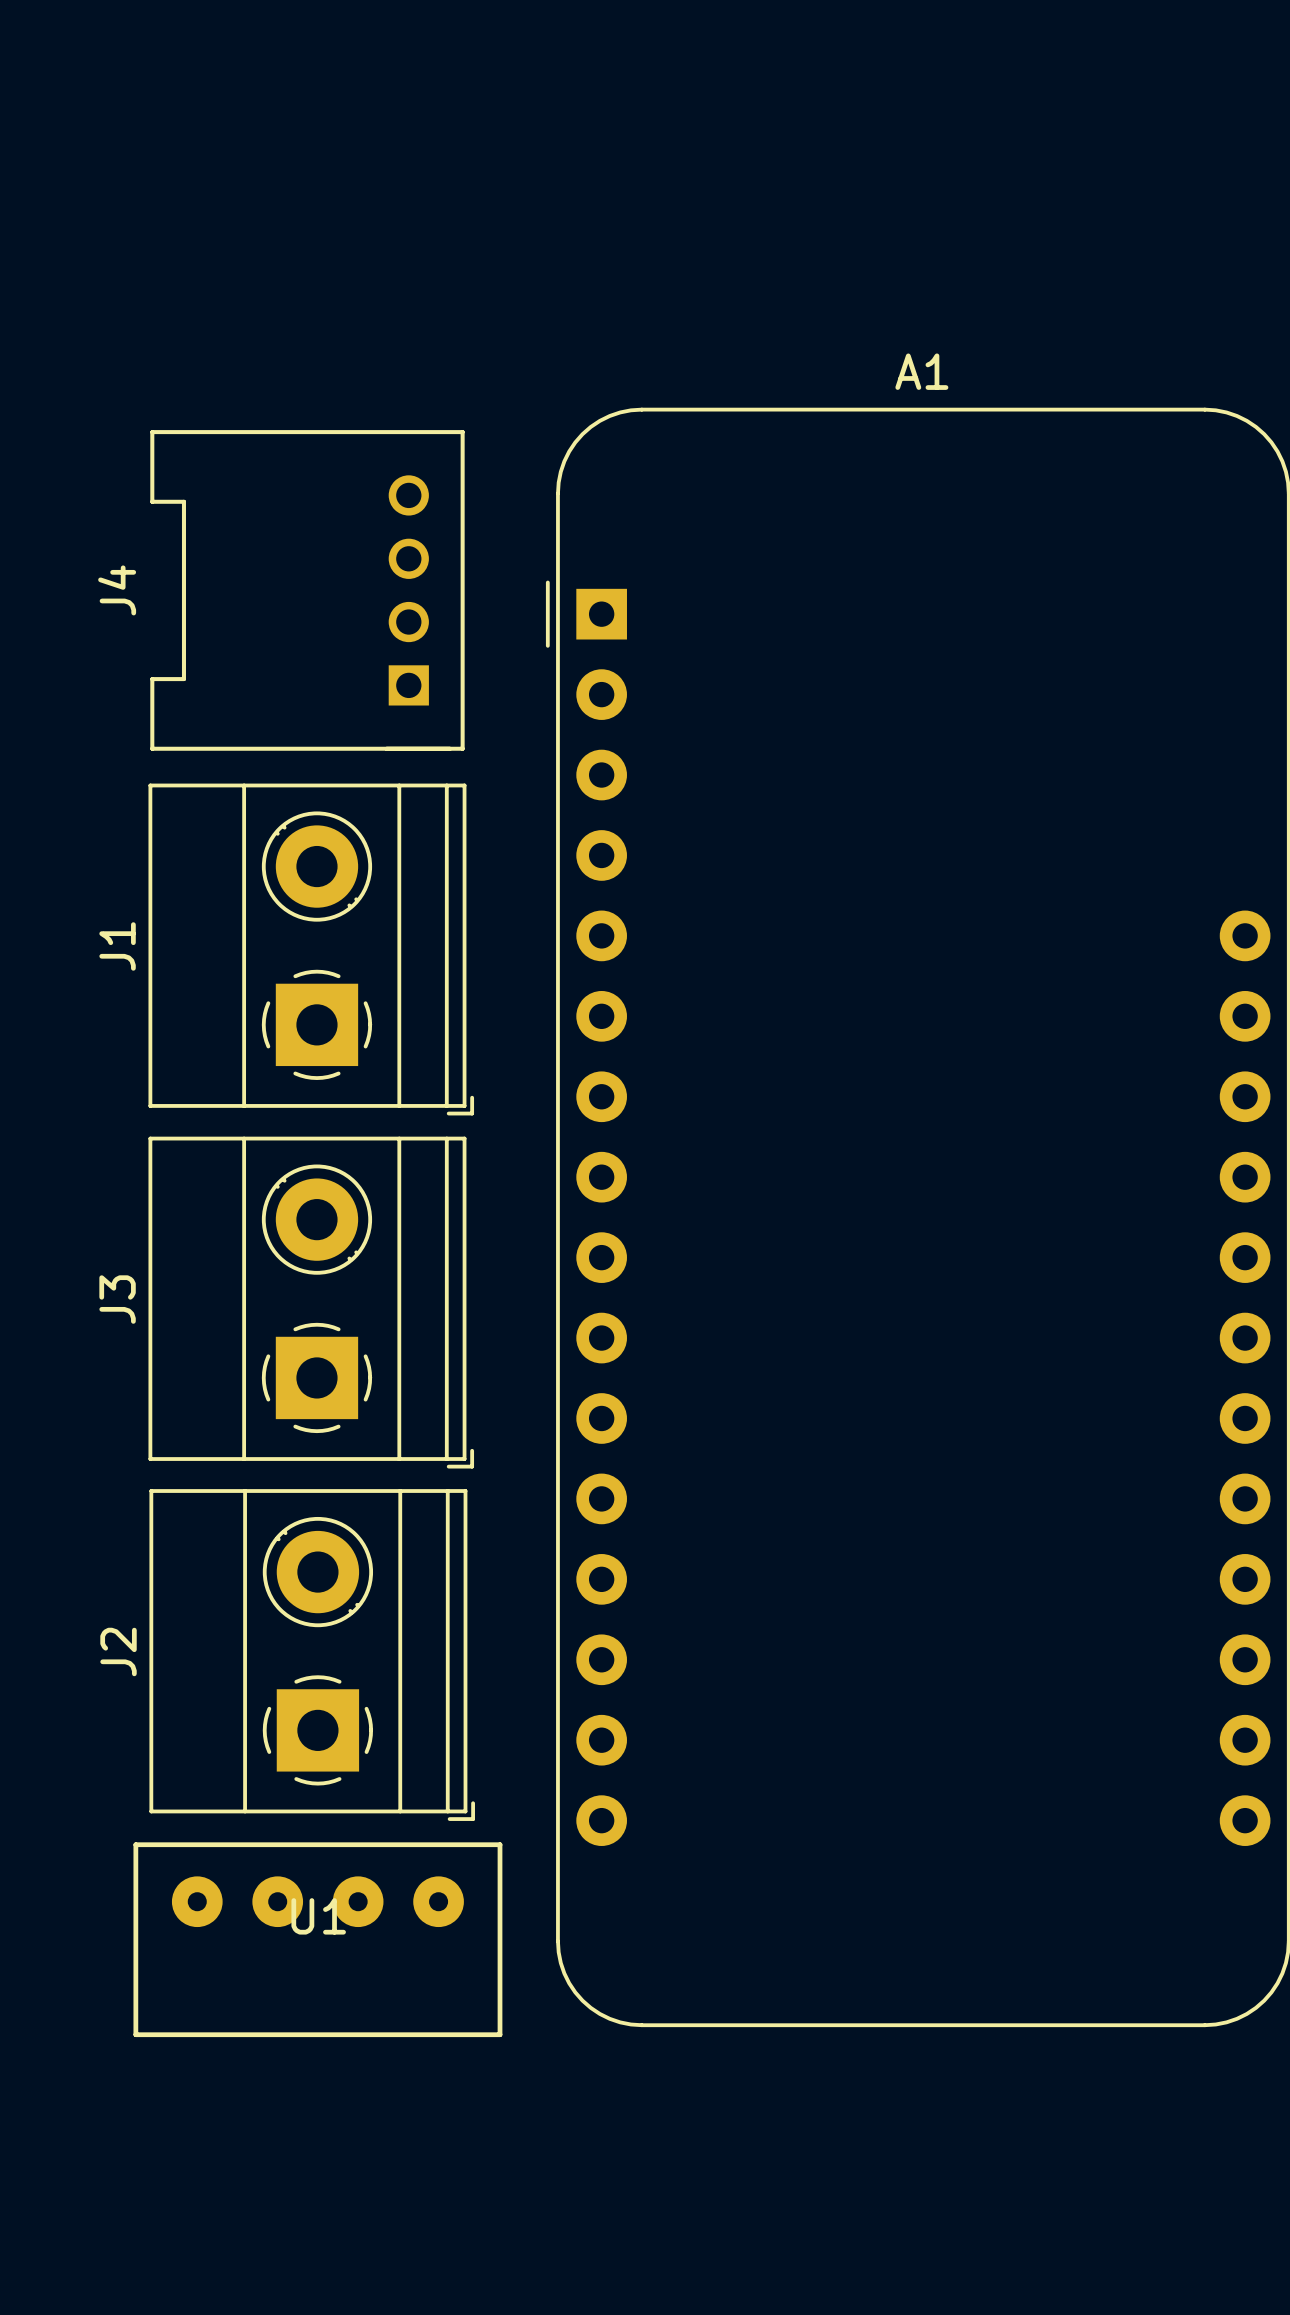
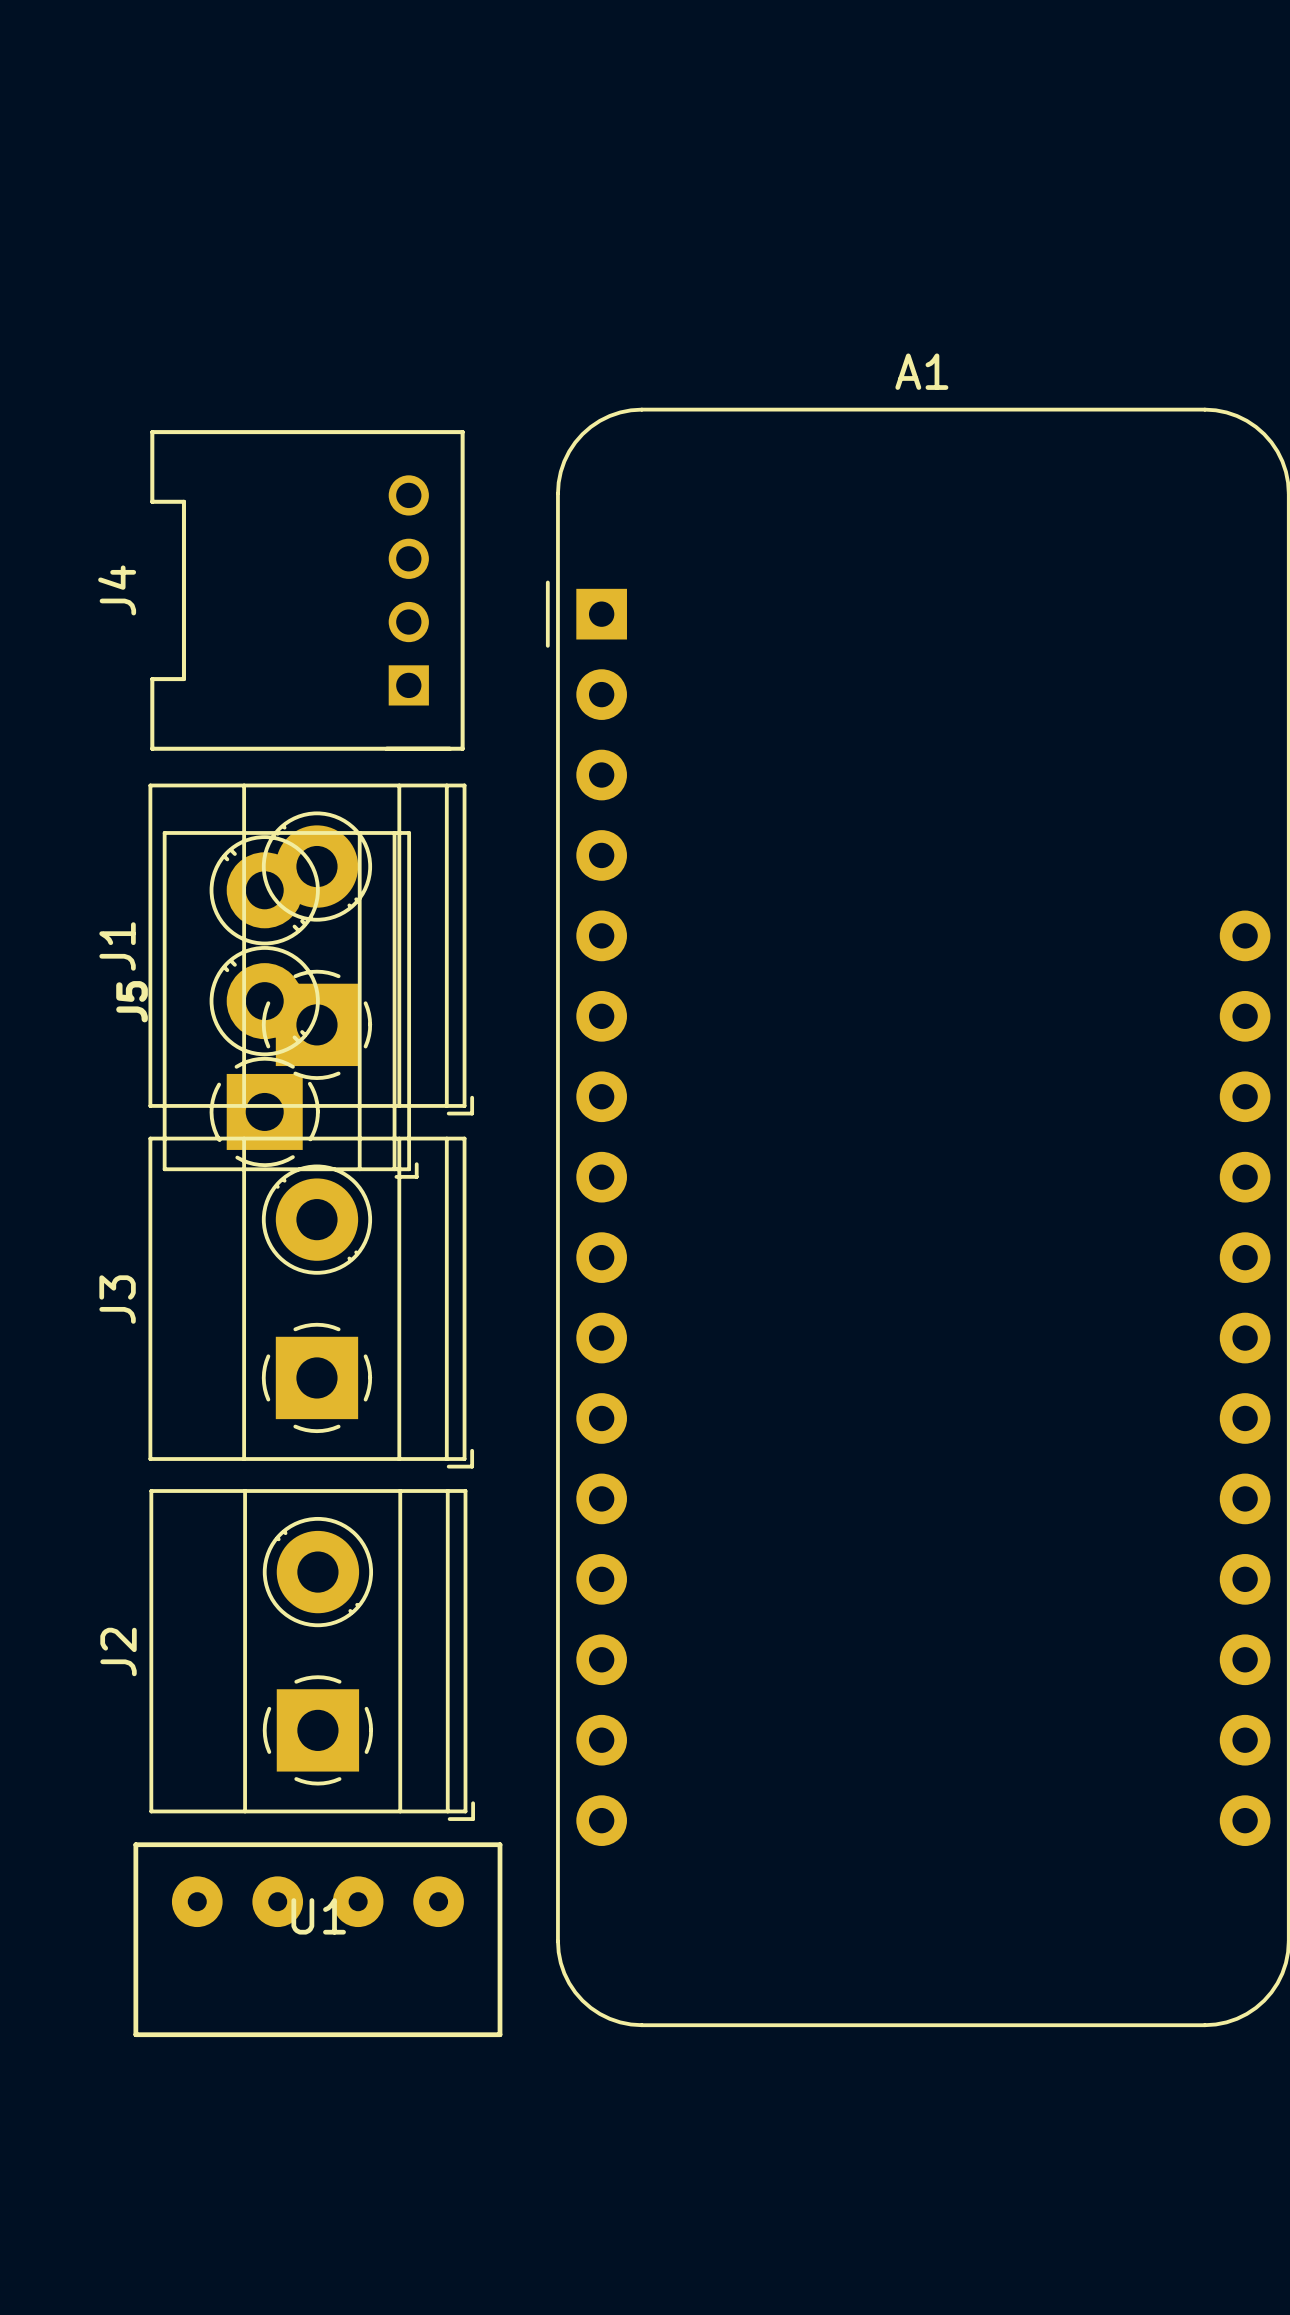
J5: none -> (290, 1004)

